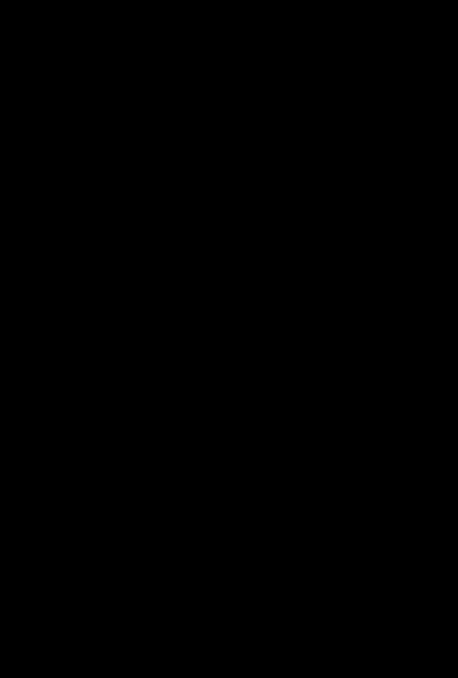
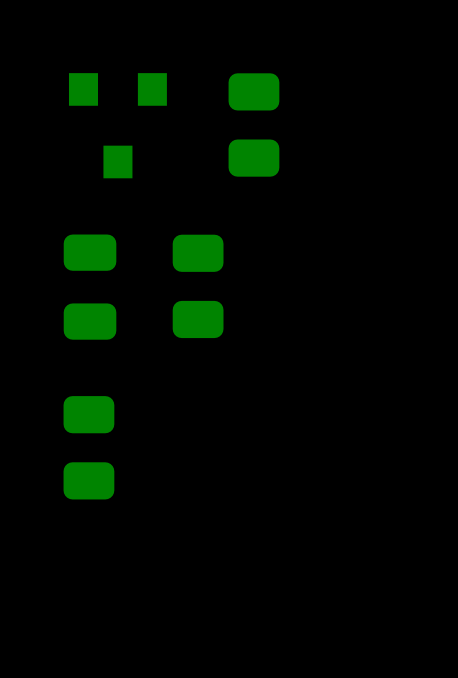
part: none -> (253, 124)
part: none -> (117, 125)
part: none -> (198, 286)
part: none -> (90, 287)
part: none -> (88, 447)

